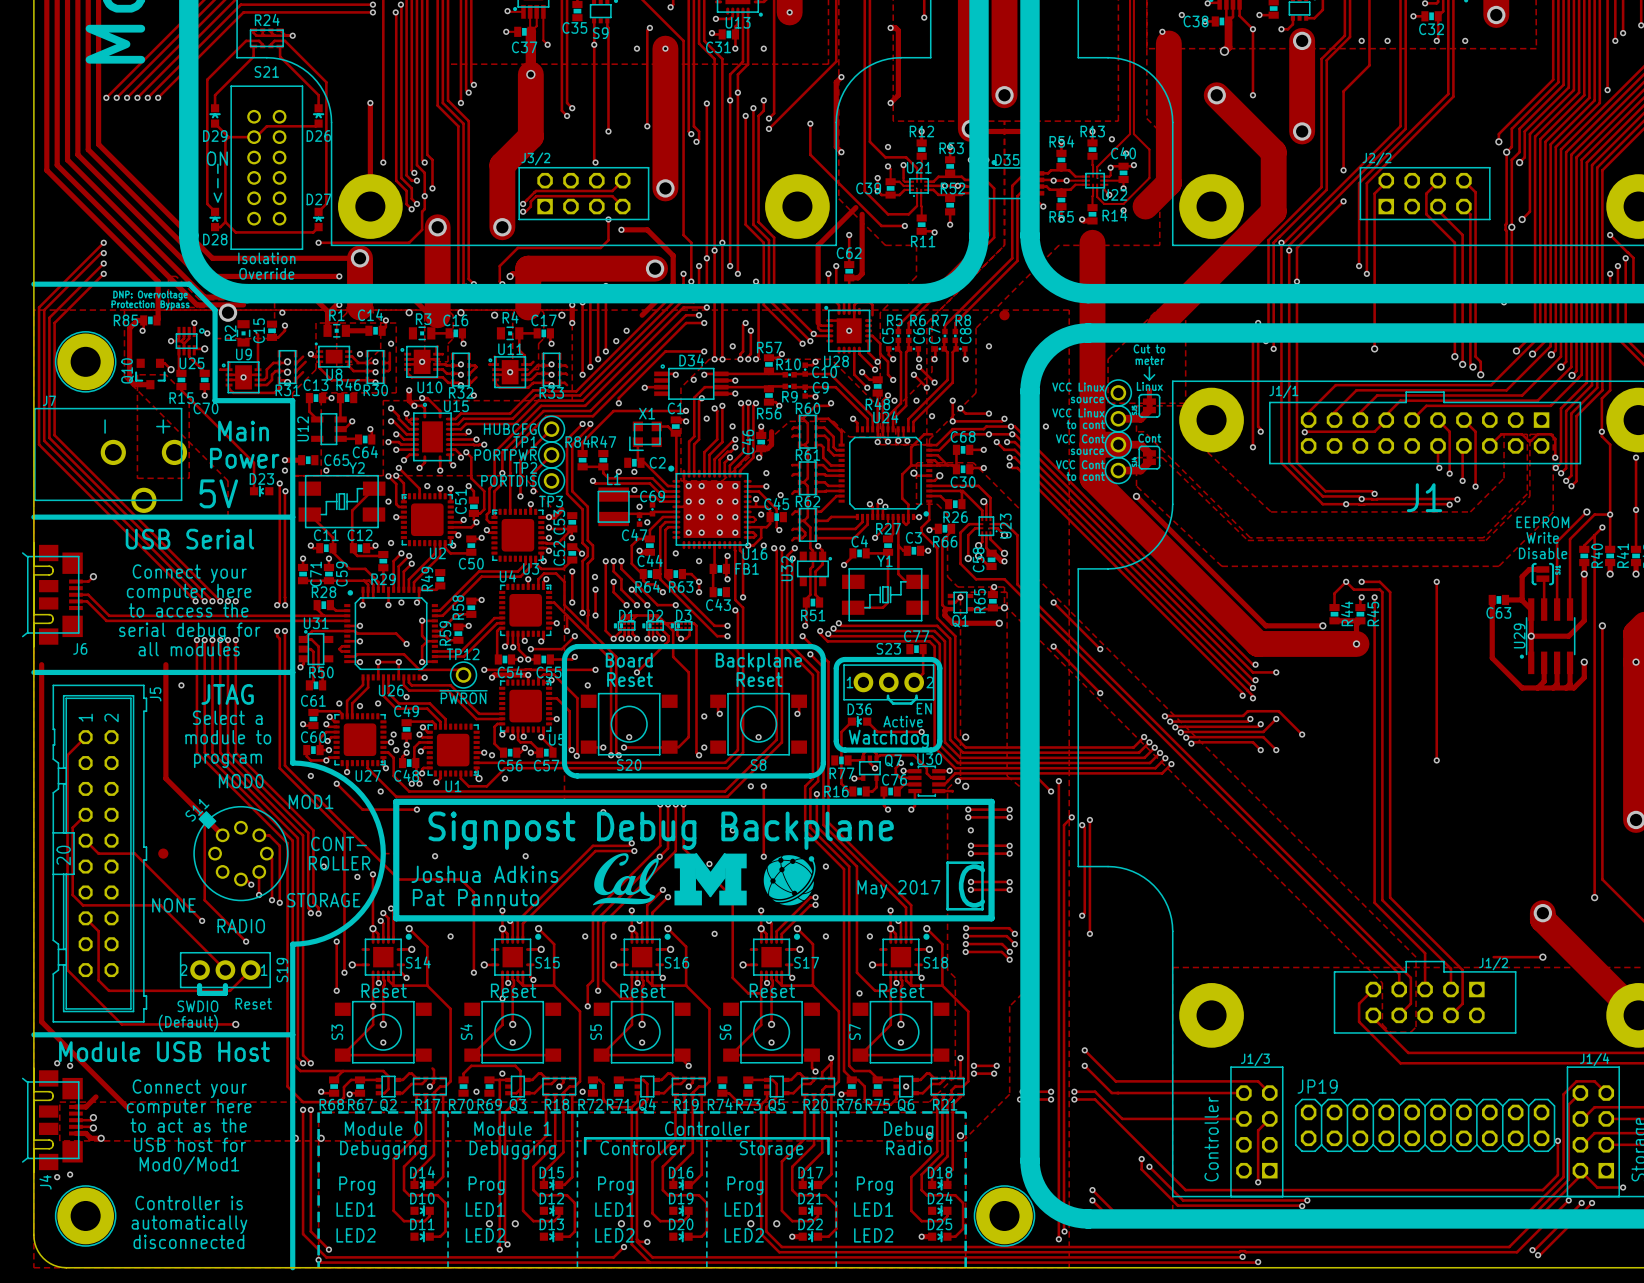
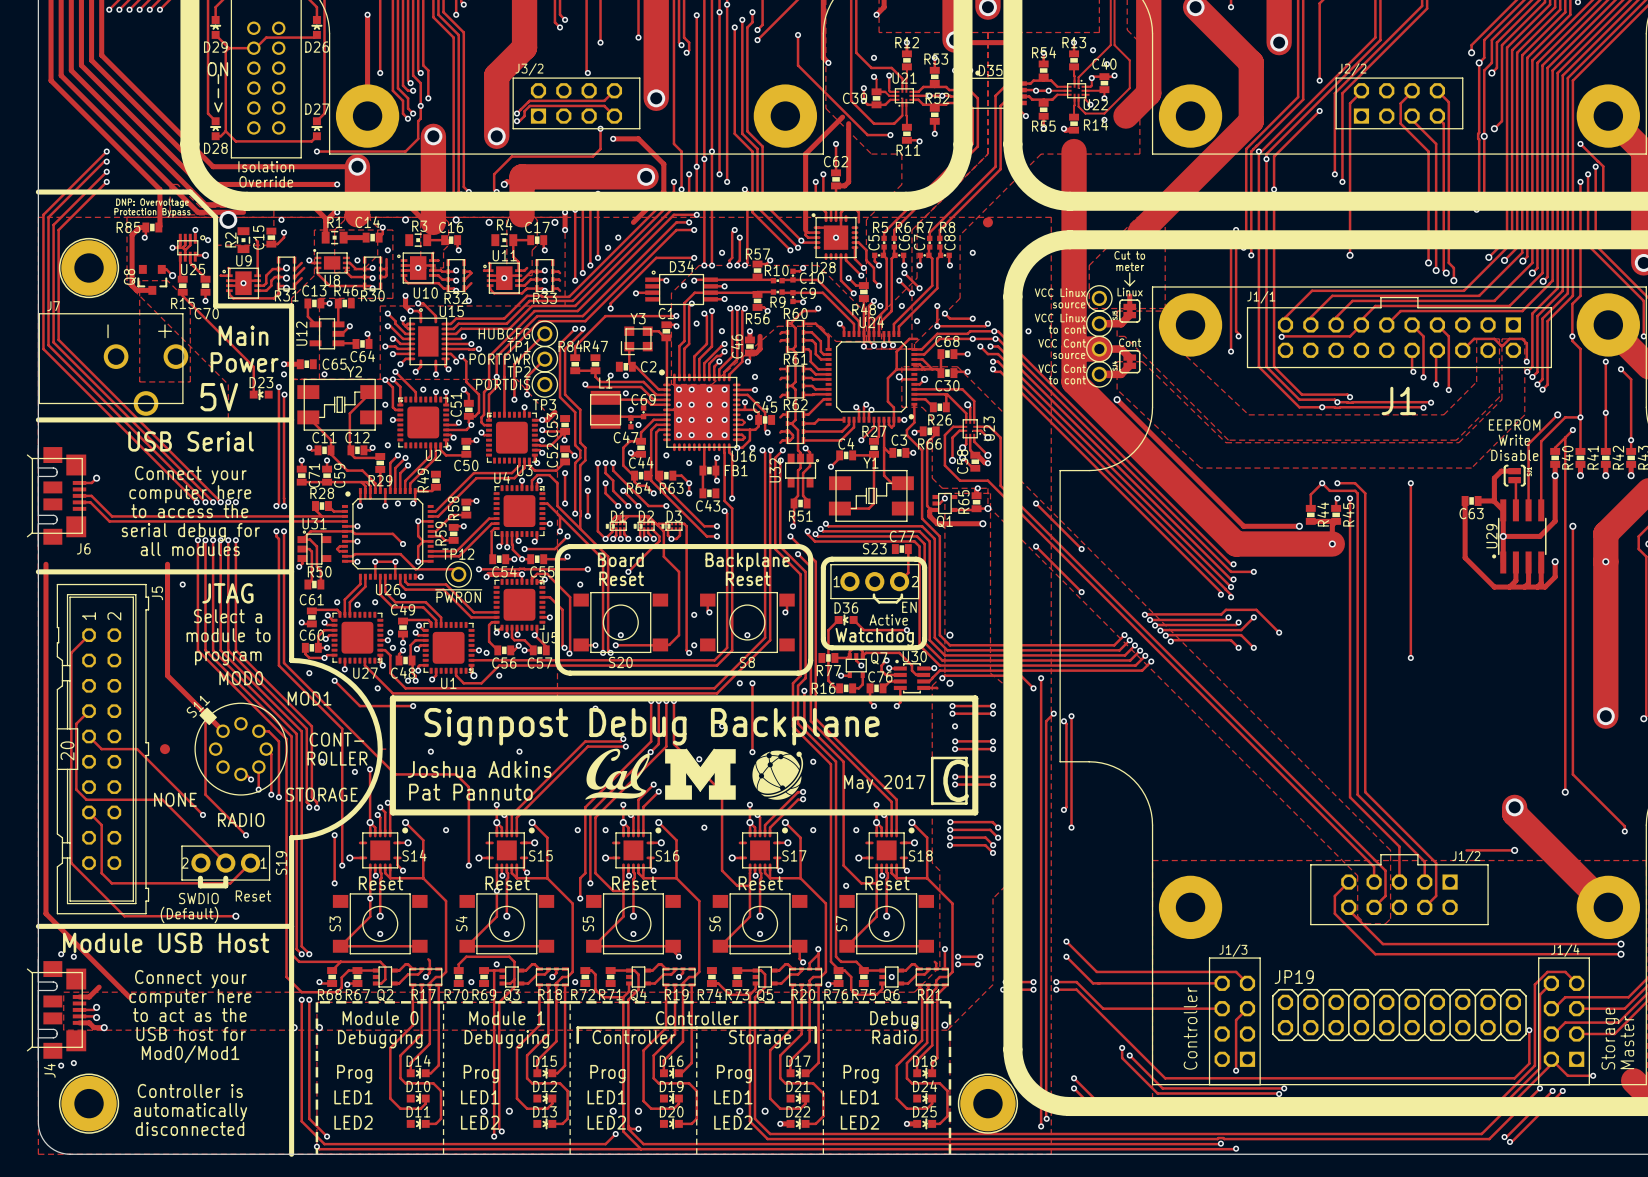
Q10 name: Q10 (127, 370) -> Q8 (130, 276)
X1 name: X1 (647, 413) -> Y3 (638, 318)

